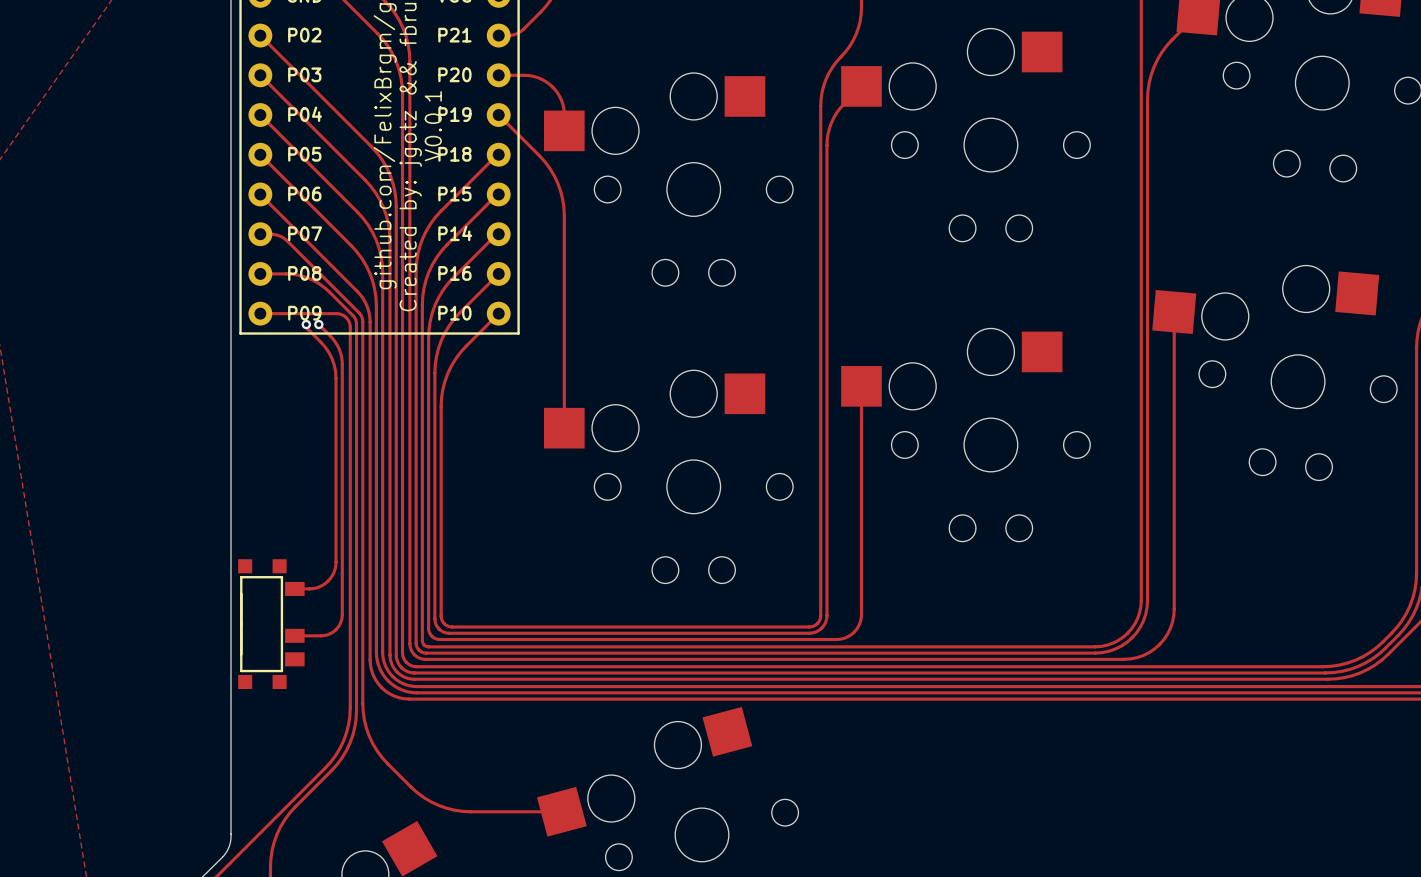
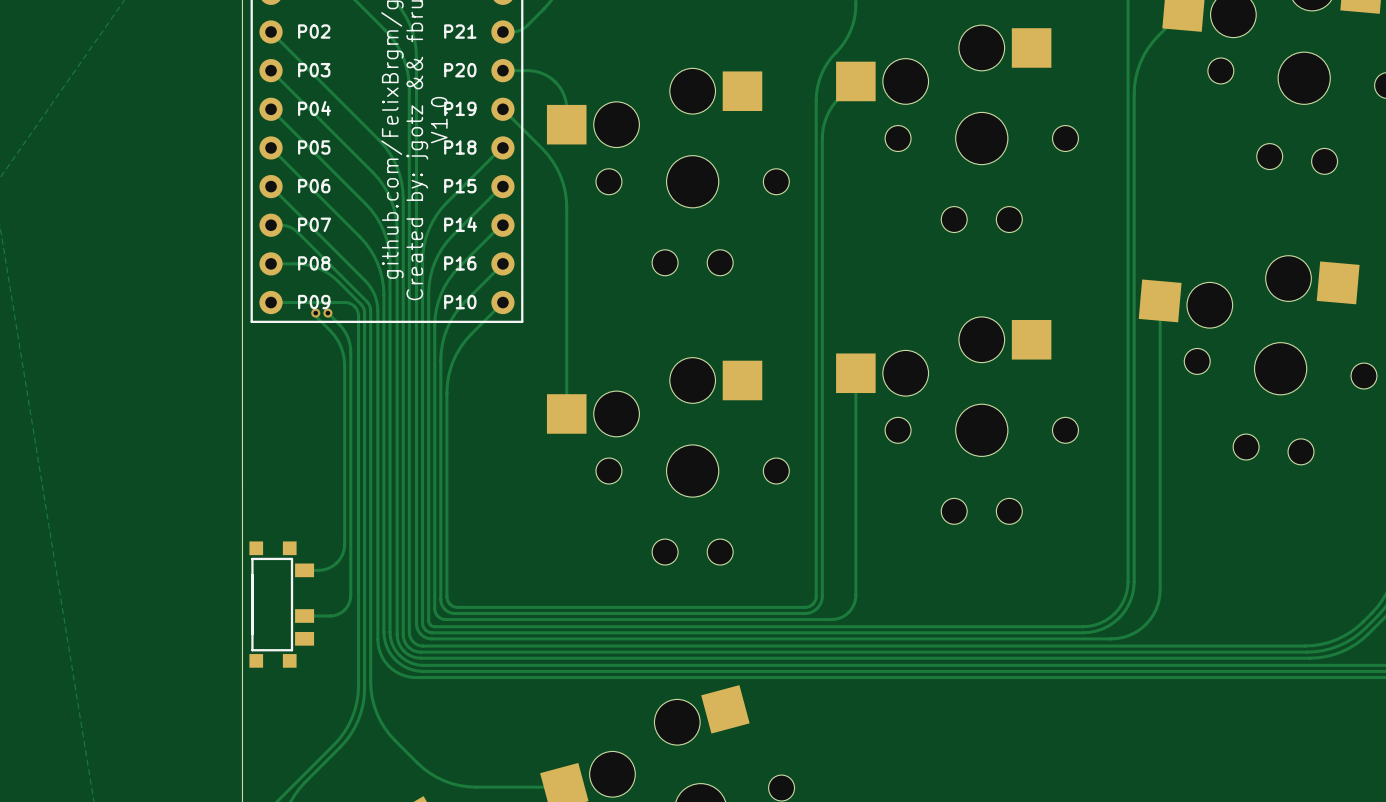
text: V0.0.1 (433, 126) -> V1.0 (439, 120)

